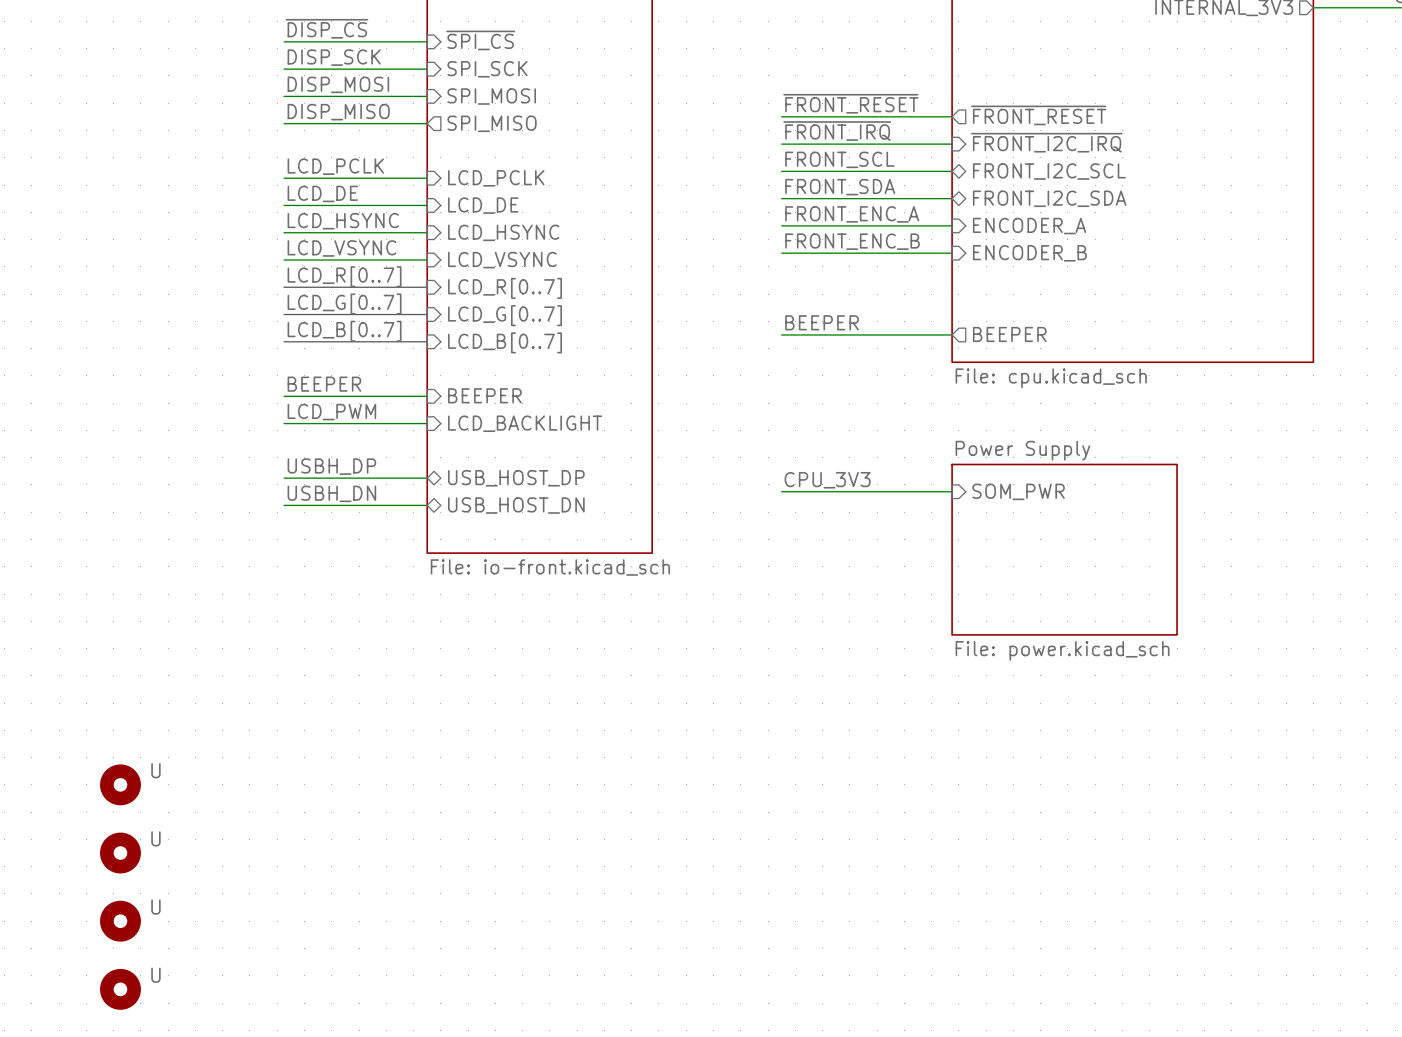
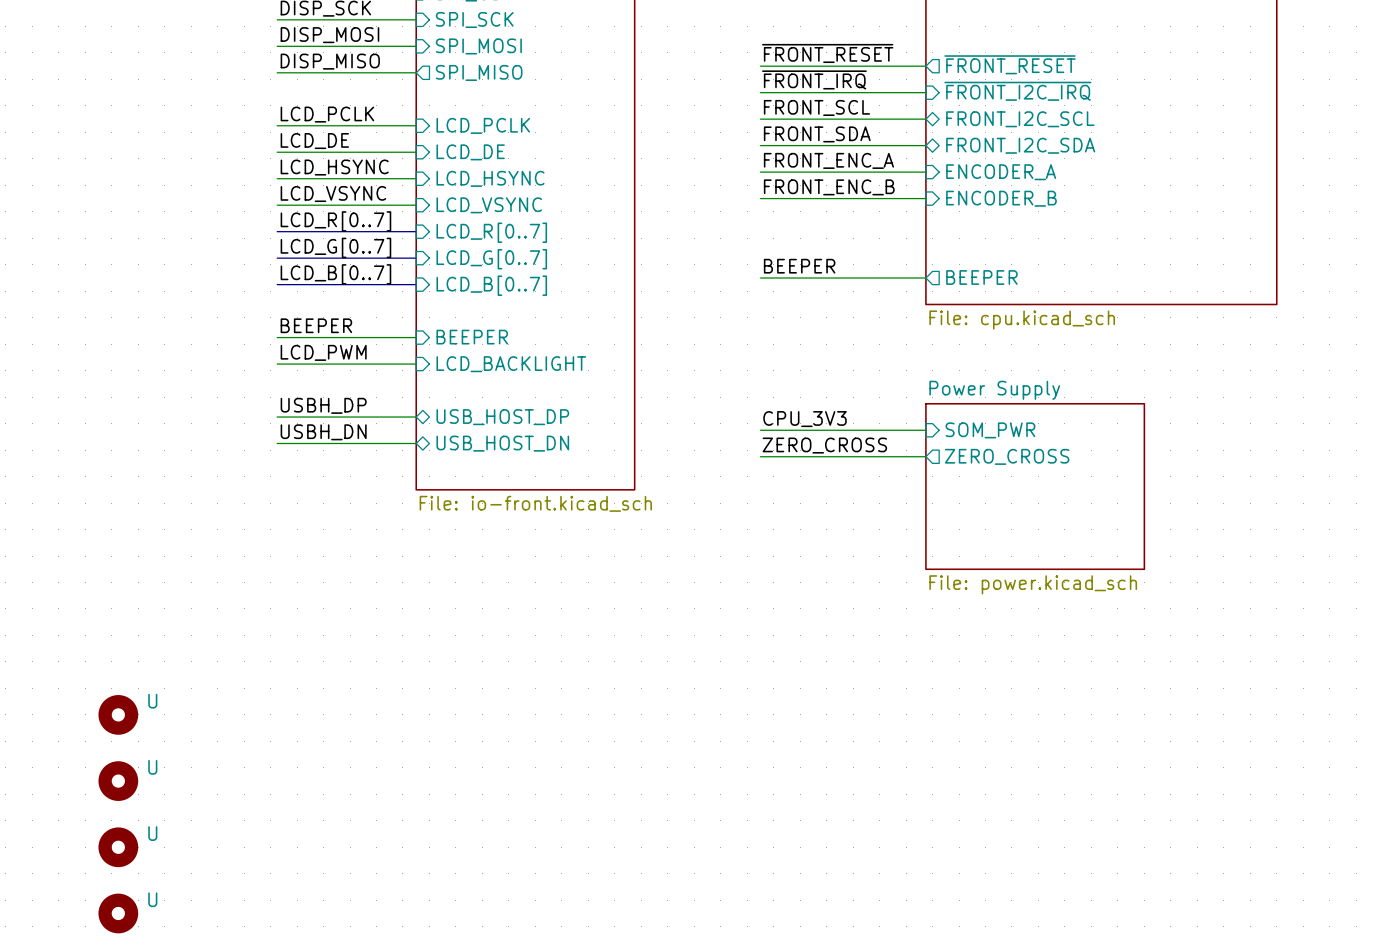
label: none -> ZERO_CROSS (824, 445)
wire: none -> (760, 456) (925, 456)
sheet pin: none -> ZERO_CROSS (1007, 456)

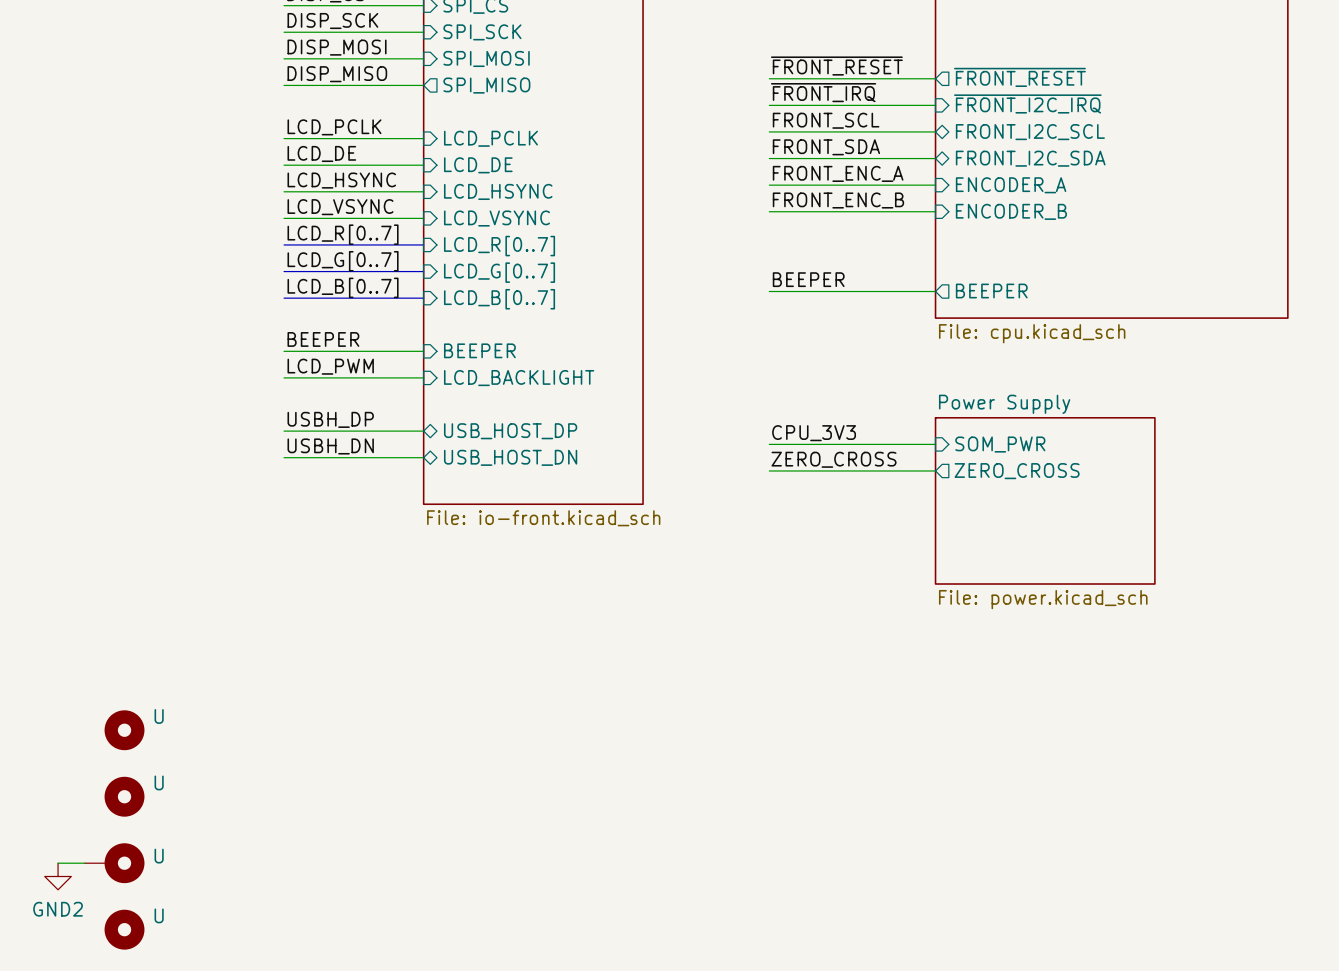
U symbol: [98, 827, 139, 868] -> [84, 843, 145, 884]
wire: none -> (58, 863) (84, 863)
power symbol: none -> GND2 (58, 876)

